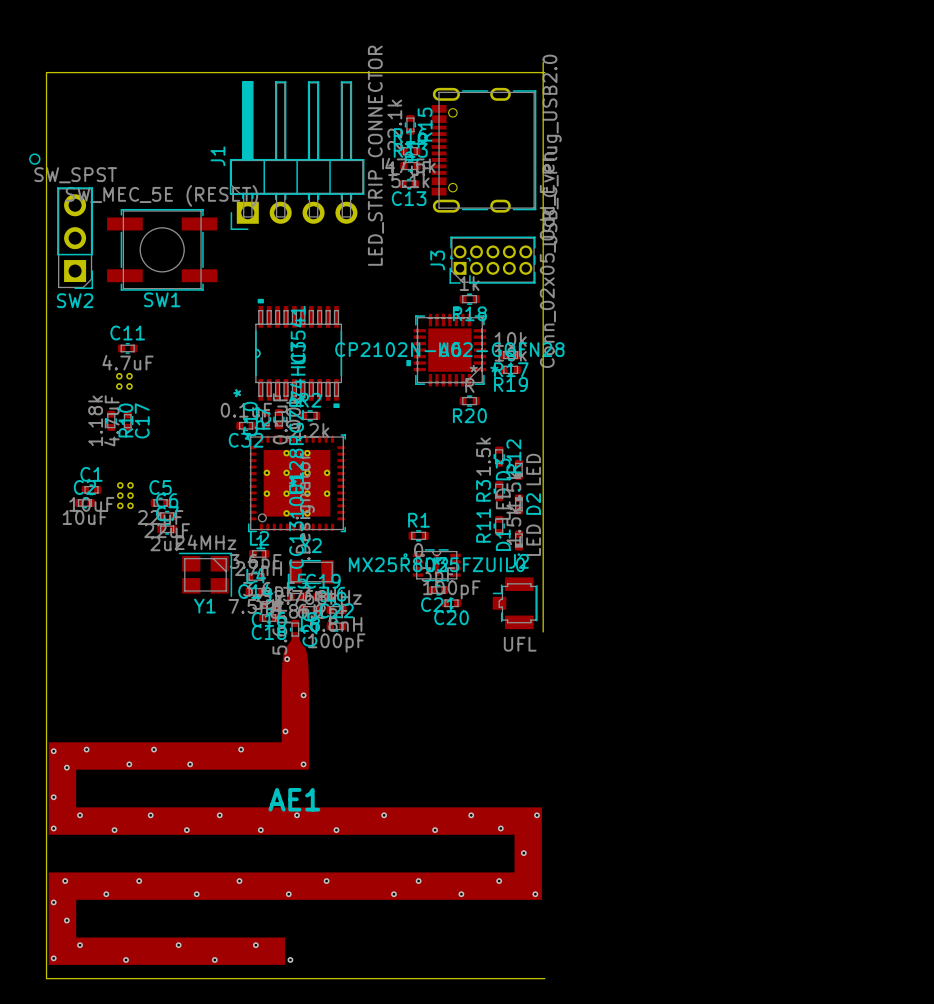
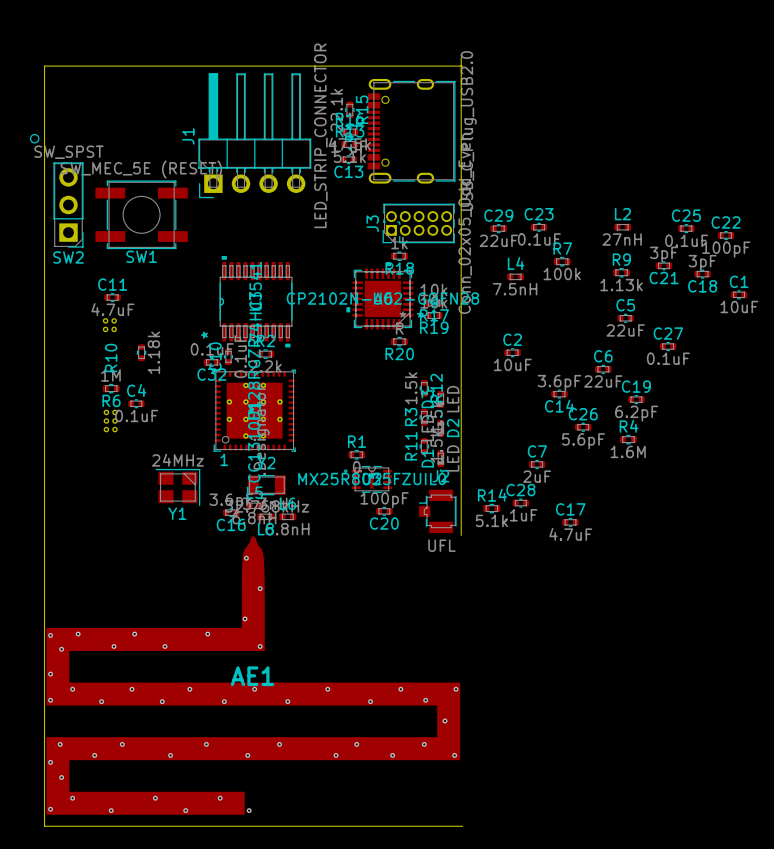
C23: none -> 0.1uF (539, 227)
C29: none -> 22uF (498, 228)
C25: none -> 0.1uF (686, 228)
R9: none -> 1.13k (621, 272)
C27: none -> 0.1uF (668, 346)
R7 rotation: 0° (278, 419) -> 90° clockwise (562, 261)
R7 position: (278, 419) -> (562, 261)
R10 value position: 1.18k (95, 420) -> 1.18k (153, 352)
R10 position: (111, 420) -> (141, 352)
C17 rotation: 0° (127, 421) -> 90° clockwise (570, 522)
C17 position: (127, 421) -> (570, 522)
R6: none -> 1M (111, 388)
C4: none -> 0.1uF (136, 403)
C1 position: (91, 489) -> (739, 294)
C2 position: (84, 502) -> (512, 352)
C5 position: (160, 502) -> (625, 318)
C6 position: (167, 516) -> (603, 369)
R4: none -> 1.6M (628, 439)
C7 position: (167, 529) -> (537, 464)
L2 position: (259, 553) -> (622, 227)
C14 position: (255, 576) -> (559, 394)
C21 position: (438, 590) -> (663, 265)
L4 position: (255, 591) -> (515, 276)
C28: none -> .1uF (520, 503)
C19 position: (323, 596) -> (636, 399)
R14: none -> 5.1k (491, 508)
C18 position: (269, 618) -> (702, 274)
C22 position: (336, 626) -> (726, 235)
C26 rotation: 0° (295, 629) -> 90° clockwise (583, 427)
C26 position: (295, 629) -> (583, 427)

